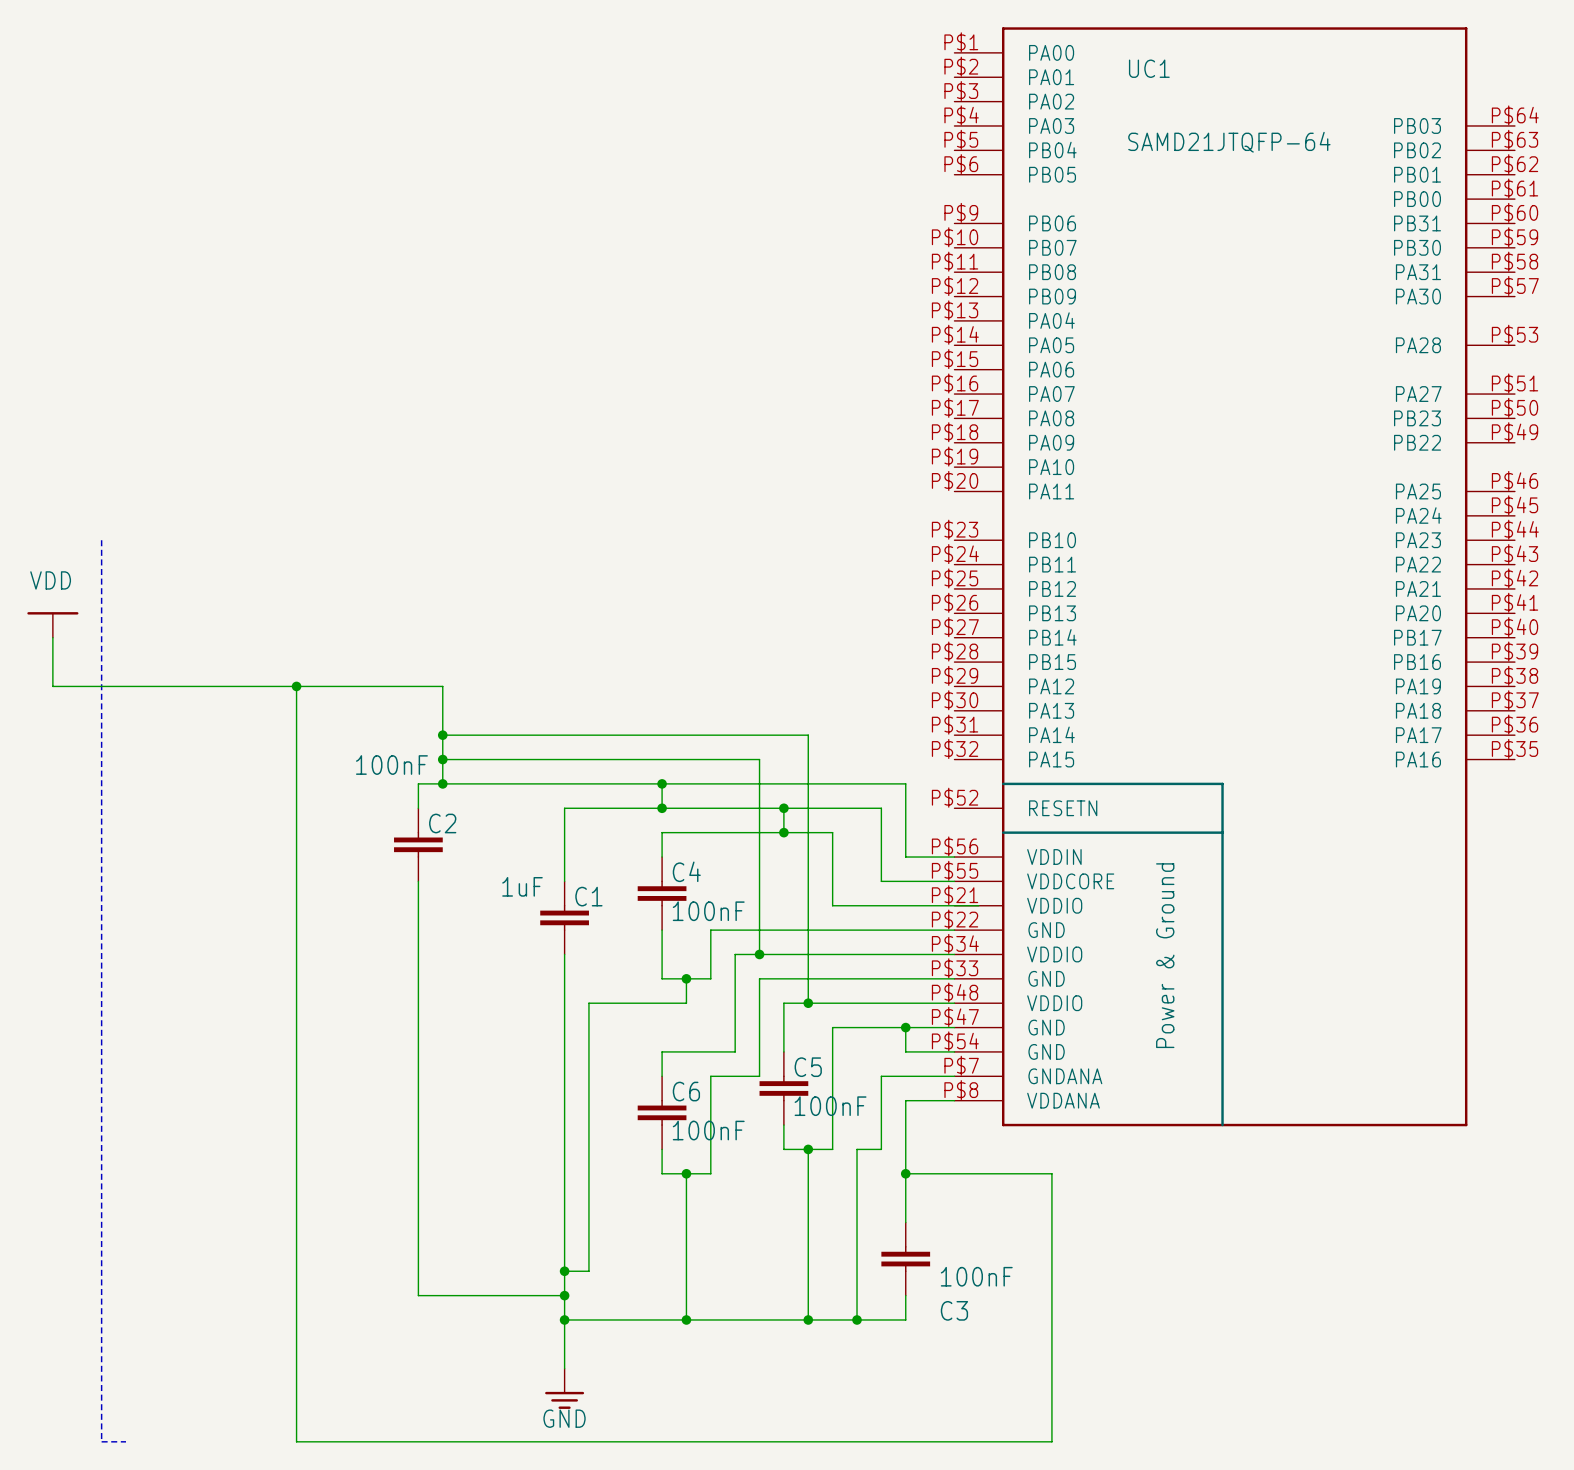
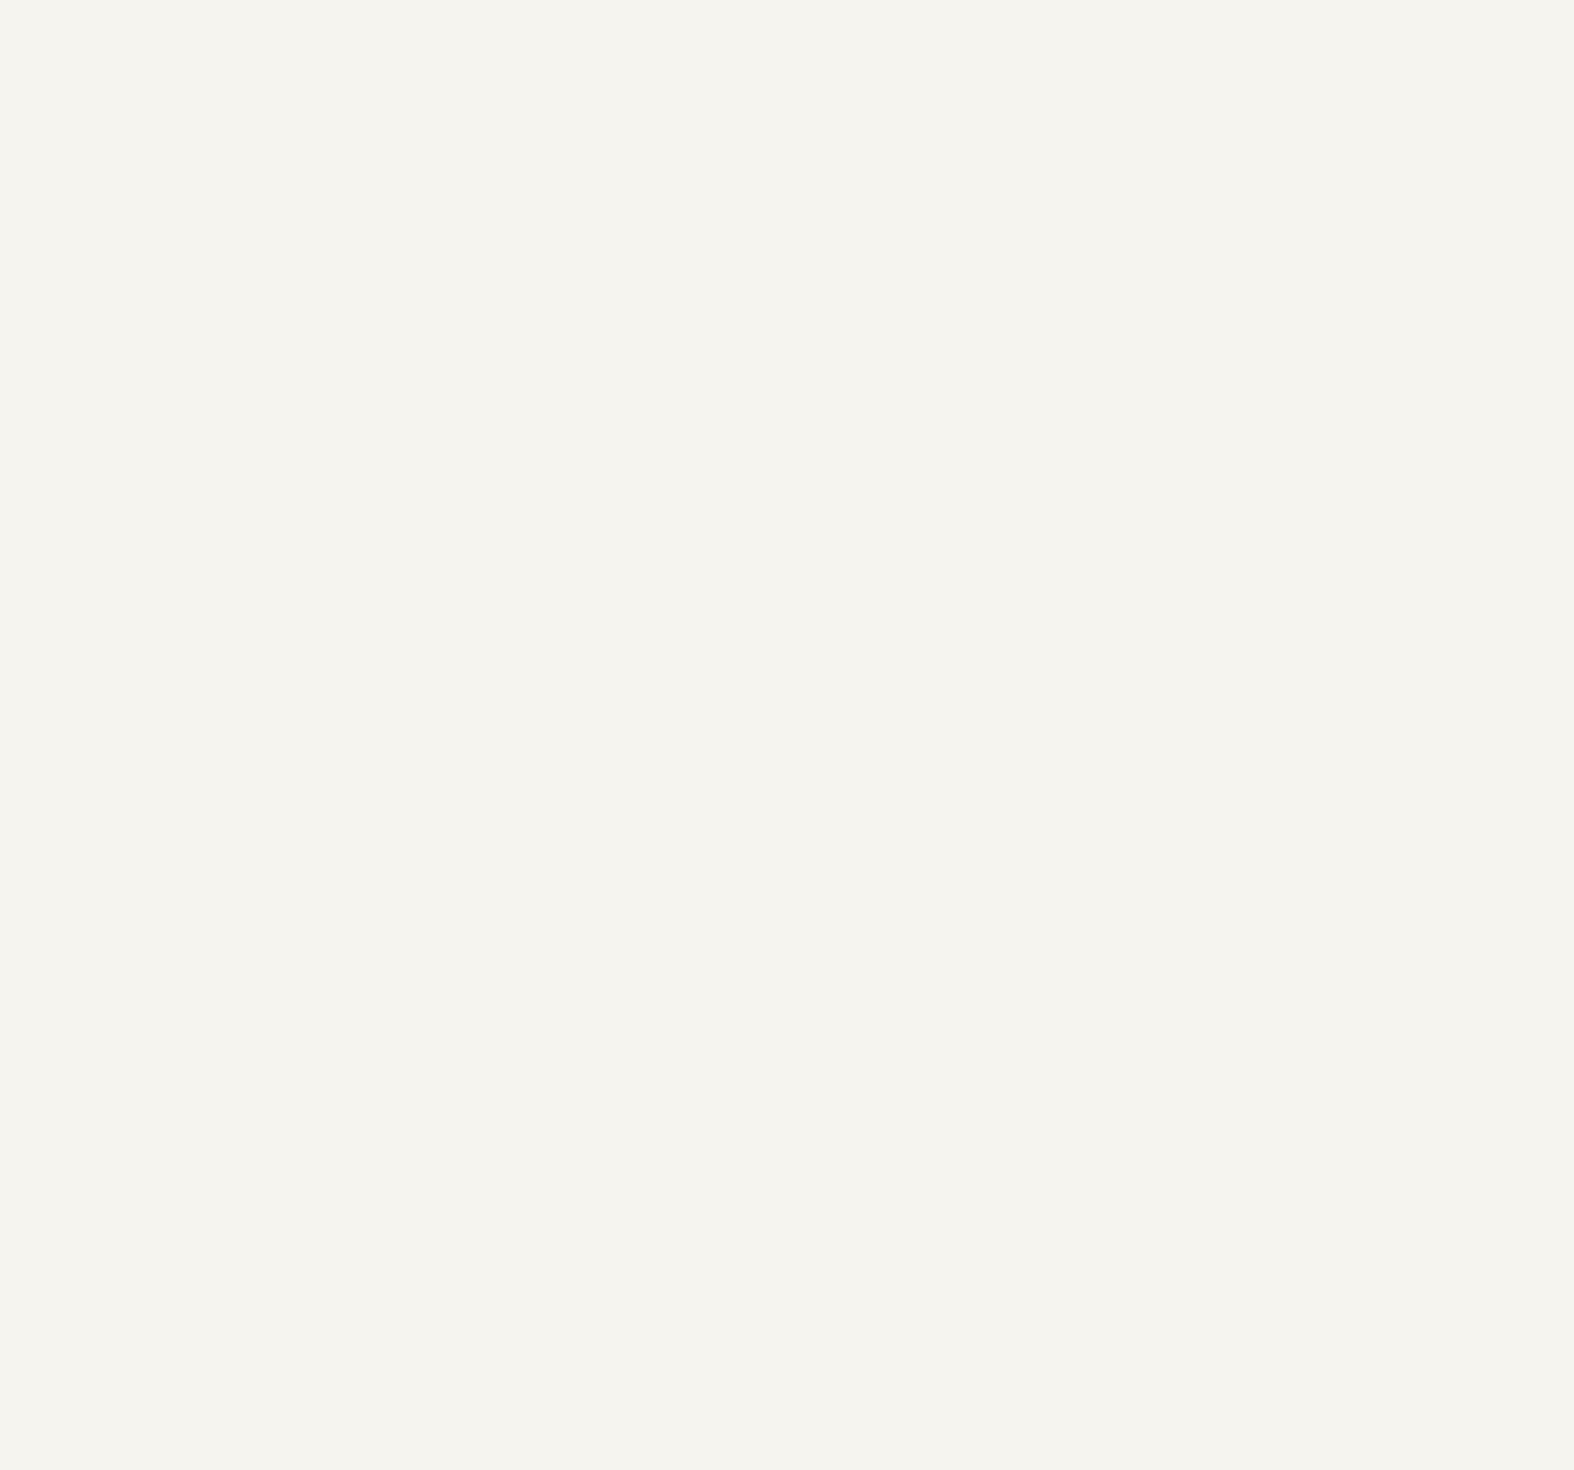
line: (101, 540) (101, 1441) (125, 1441) -> none
UC1: SAMD21JTQFP-64 (1234, 576) -> none
power symbol: VDD (52, 624) -> none
wire: (52, 637) (52, 686) (442, 686) (442, 783) -> none
wire: (296, 686) (296, 1441) (1051, 1441) (1051, 1173) (905, 1173) -> none
junction: (296, 686) -> none
wire: (442, 735) (808, 735) (808, 1003) -> none
junction: (442, 735) -> none
wire: (442, 759) (759, 759) (759, 954) -> none
junction: (442, 759) -> none
junction: (442, 783) -> none
wire: (662, 783) (662, 808) -> none
junction: (662, 783) -> none
wire: (418, 808) (418, 783) (905, 783) (905, 857) (954, 857) -> none
junction: (662, 808) -> none
wire: (783, 808) (783, 832) -> none
junction: (783, 808) -> none
junction: (783, 832) -> none
C2: 100nF (418, 844) -> none
wire: (662, 857) (662, 832) (832, 832) (832, 905) (978, 905) -> none
wire: (418, 881) (418, 1295) (564, 1295) -> none
wire: (564, 881) (564, 808) (881, 808) (881, 881) (954, 881) -> none
C4: 100nF (662, 893) -> none
C1: 1uF (564, 917) -> none
wire: (662, 930) (662, 978) (710, 978) (710, 930) (954, 930) -> none
wire: (564, 954) (564, 1368) -> none
junction: (759, 954) -> none
wire: (954, 954) (735, 954) (735, 1051) (662, 1051) (662, 1076) -> none
wire: (686, 978) (686, 1003) (588, 1003) (588, 1271) (564, 1271) -> none
junction: (686, 978) -> none
wire: (954, 978) (759, 978) (759, 1076) (710, 1076) (710, 1173) (662, 1173) (662, 1149) -> none
junction: (808, 1003) -> none
wire: (954, 1003) (783, 1003) (783, 1051) -> none
wire: (905, 1027) (905, 1051) (954, 1051) -> none
junction: (905, 1027) -> none
wire: (954, 1027) (832, 1027) (832, 1149) (783, 1149) (783, 1125) -> none
wire: (954, 1076) (881, 1076) (881, 1149) (857, 1149) (857, 1319) -> none
C5: 100nF (783, 1088) -> none
wire: (954, 1100) (905, 1100) (905, 1222) -> none
C6: 100nF (662, 1112) -> none
wire: (808, 1149) (808, 1319) -> none
junction: (808, 1149) -> none
wire: (686, 1173) (686, 1319) -> none
junction: (686, 1173) -> none
junction: (905, 1173) -> none
C3: 100nF (905, 1259) -> none
junction: (564, 1271) -> none
junction: (564, 1295) -> none
wire: (905, 1295) (905, 1319) (564, 1319) -> none
junction: (564, 1319) -> none
junction: (686, 1319) -> none
junction: (808, 1319) -> none
junction: (857, 1319) -> none
power symbol: GND (564, 1388) -> none

